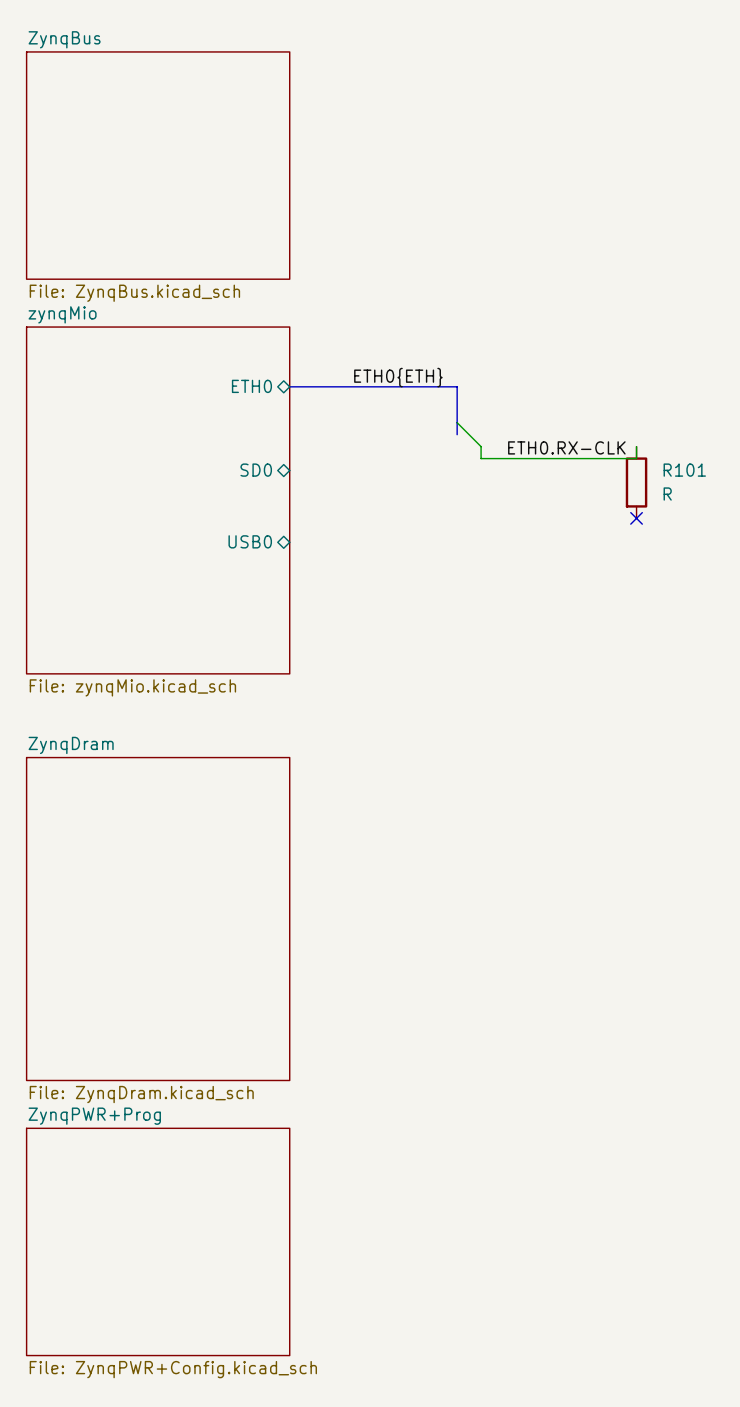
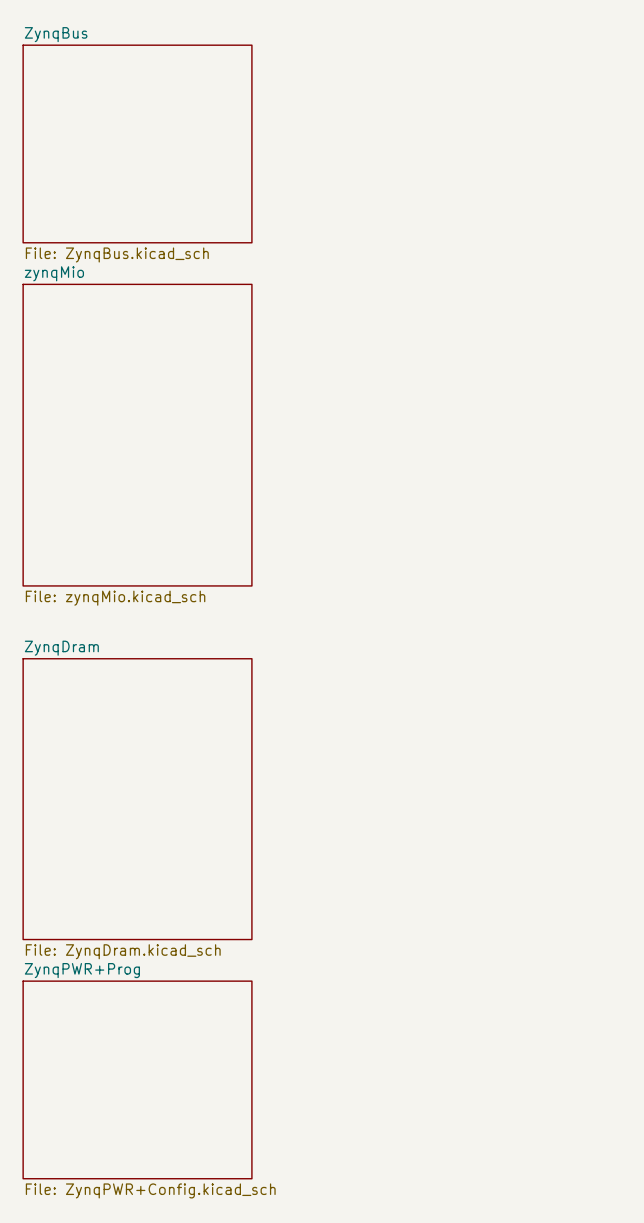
label: ETH0{ETH} (398, 377) -> none
sheet pin: ETH0 (251, 386) -> none
bus: (289, 386) (457, 386) (457, 434) -> none
wire: (457, 422) (481, 446) (481, 458) (636, 458) (636, 446) -> none
label: ETH0.RX-CLK (566, 447) -> none
sheet pin: SD0 (256, 470) -> none
R101: R (636, 482) -> none
no-connect mark: (636, 518) -> none
sheet pin: USB0 (250, 541) -> none

